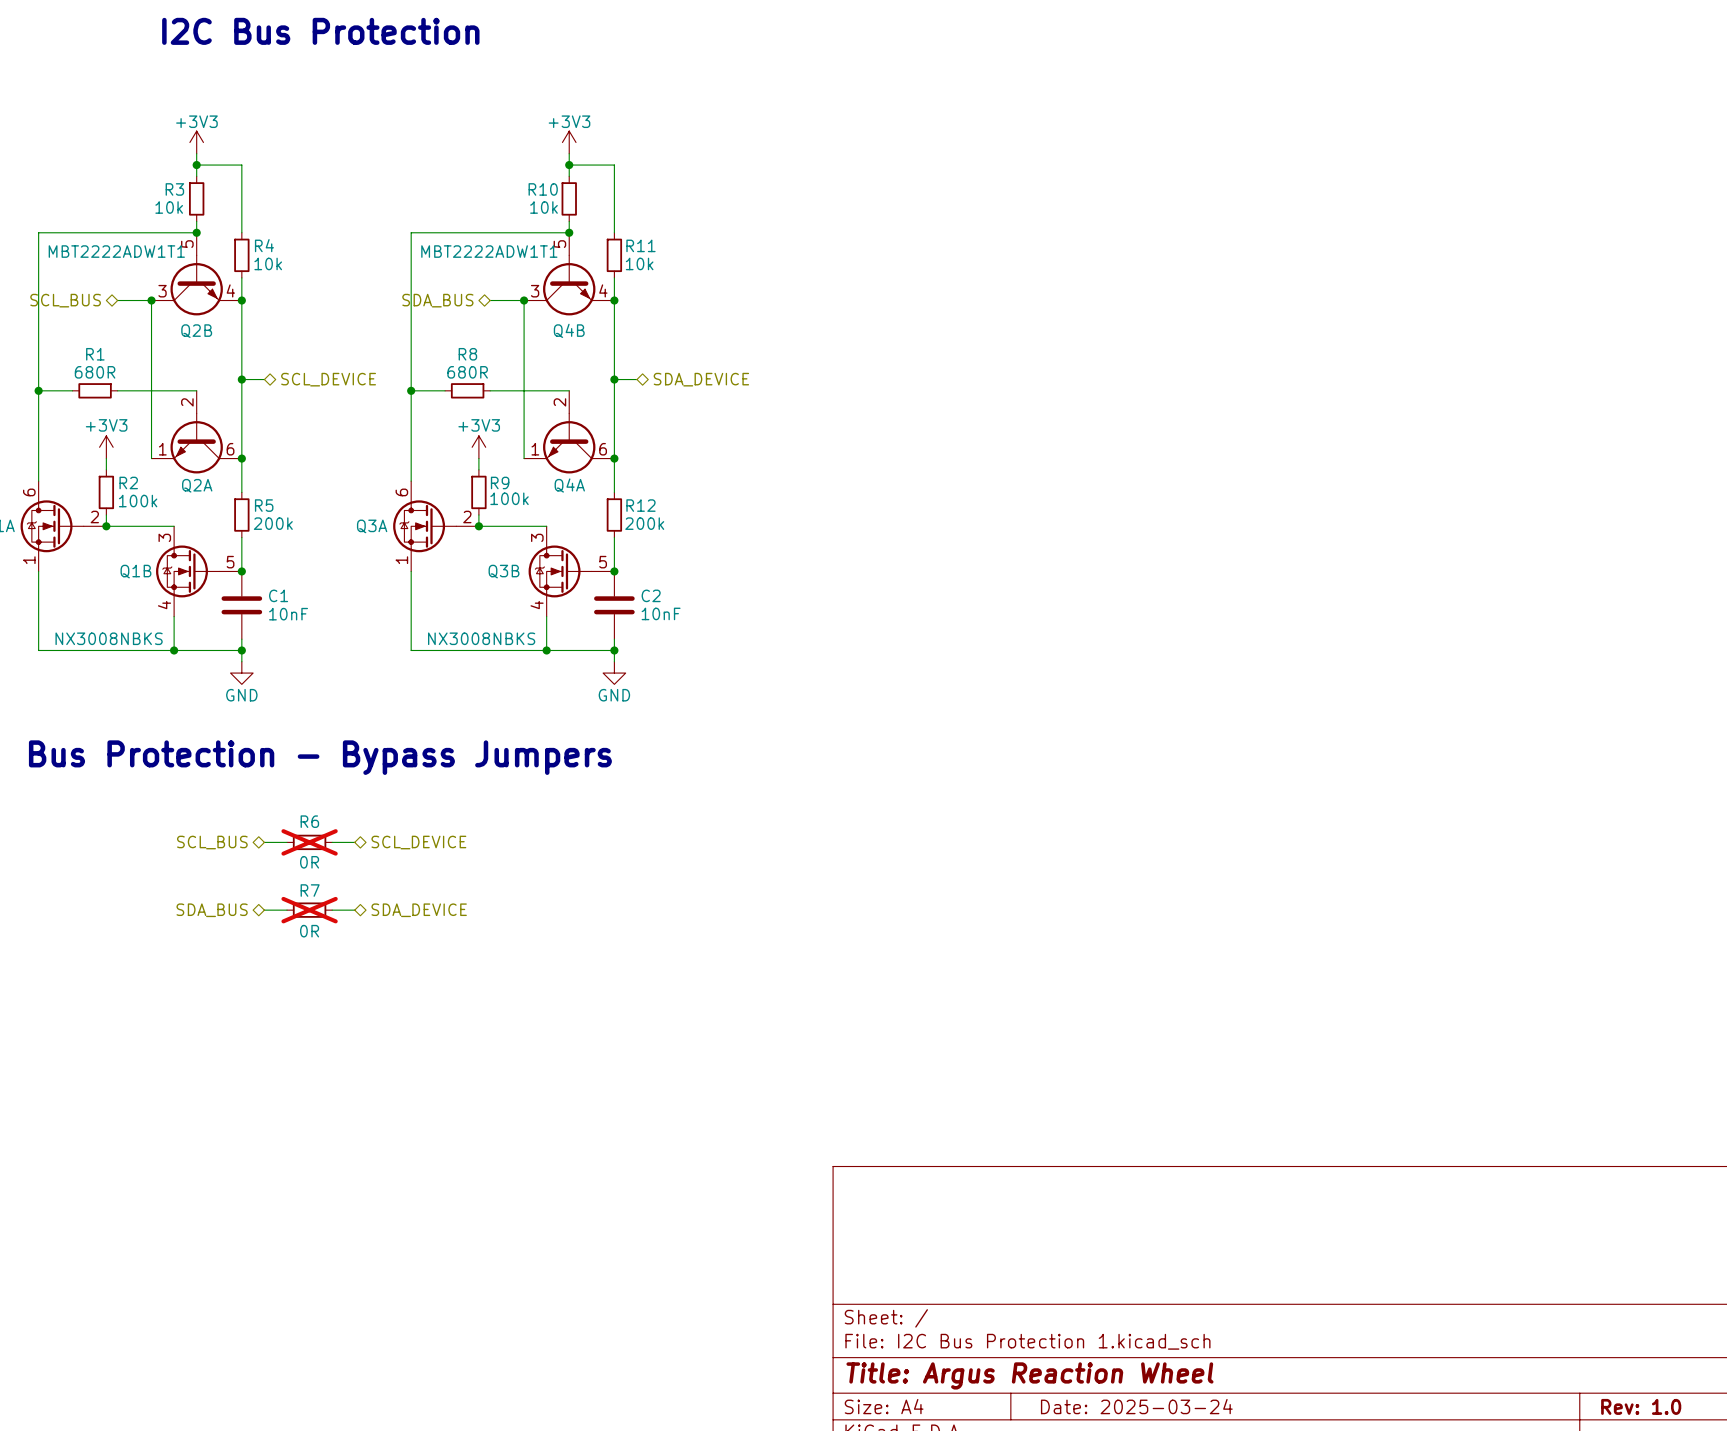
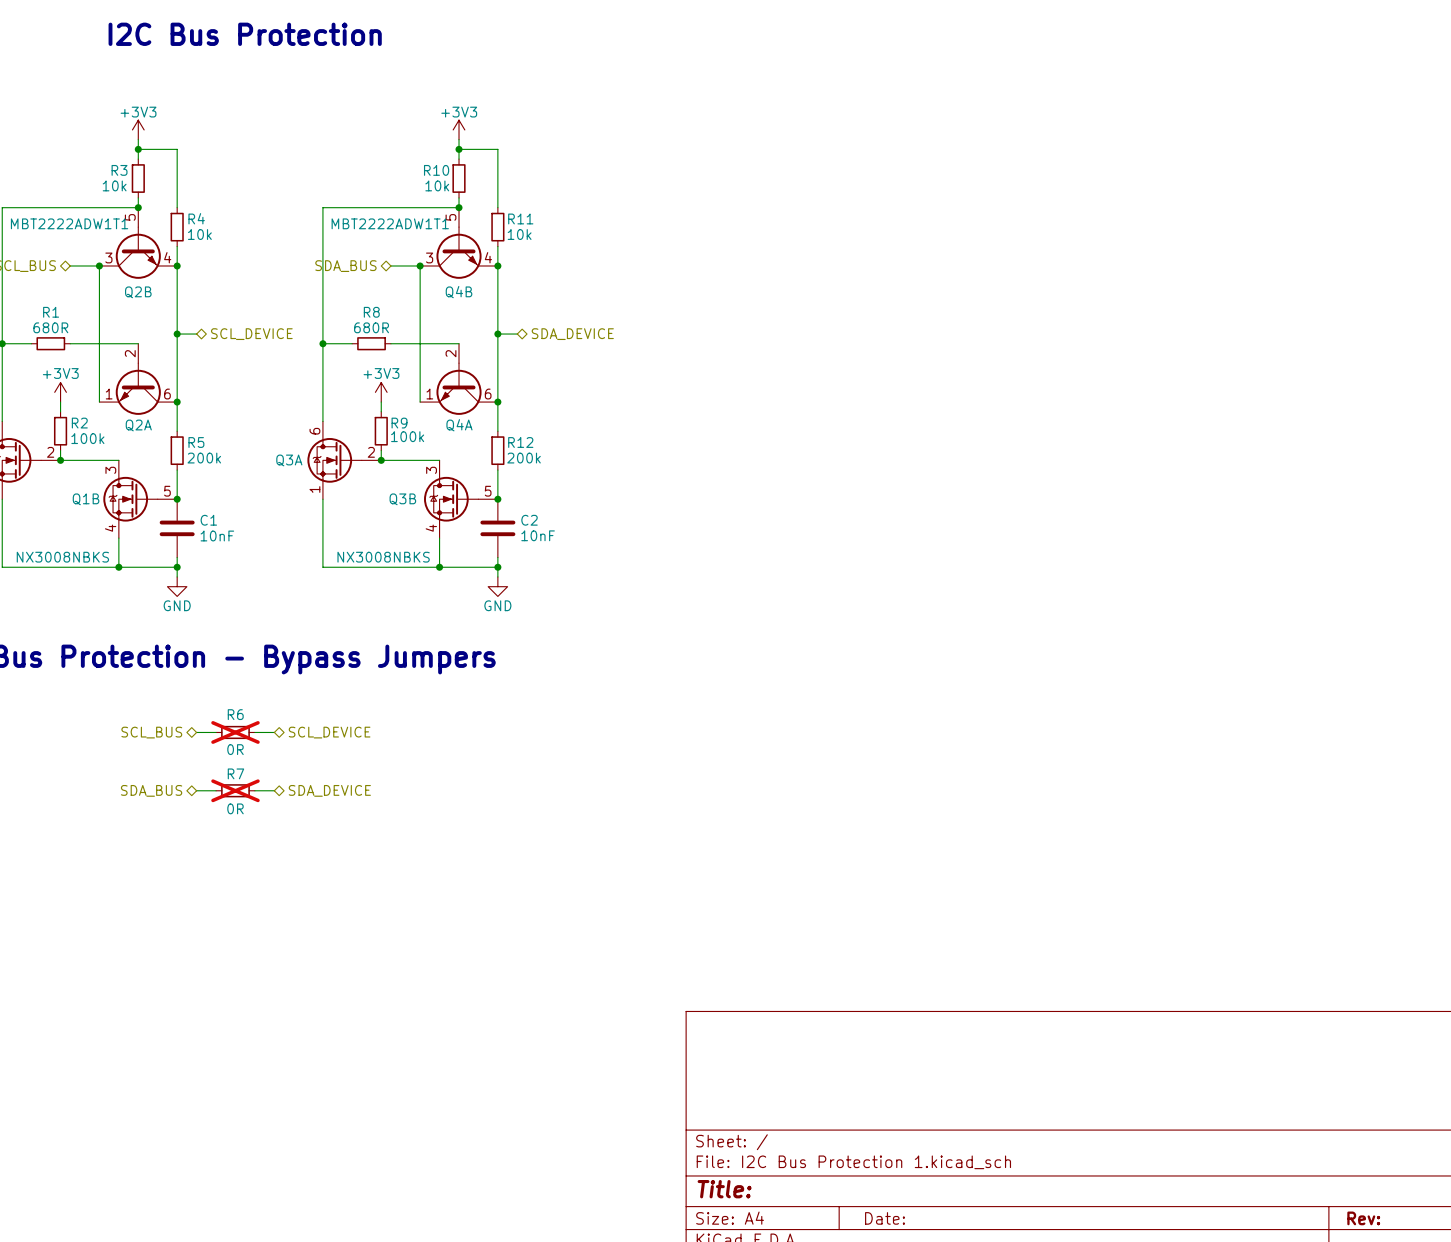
title block: Title: Argus Reaction Wheel (1029, 1375) -> Title: (724, 1189)
title block: Date: 2025-03-24 (1136, 1406) -> Date: (885, 1218)
title block: Rev: 1.0 (1641, 1406) -> Rev: (1363, 1218)

